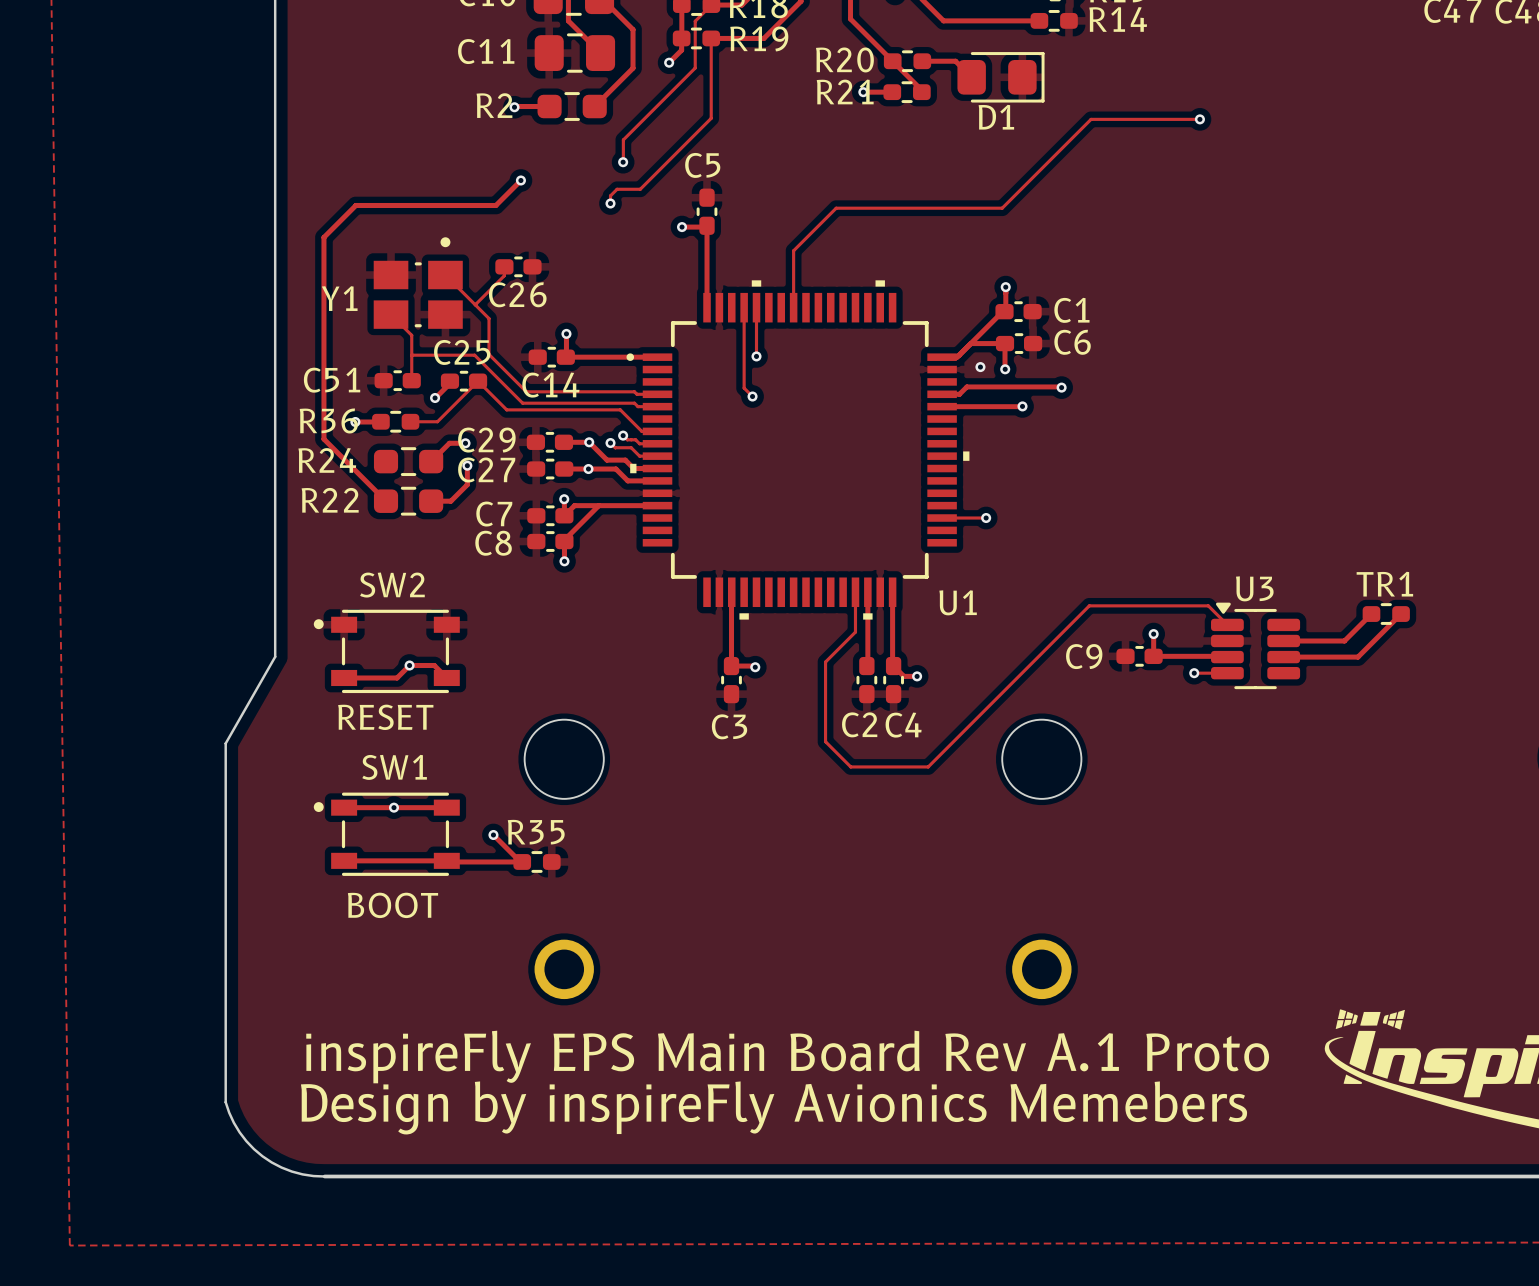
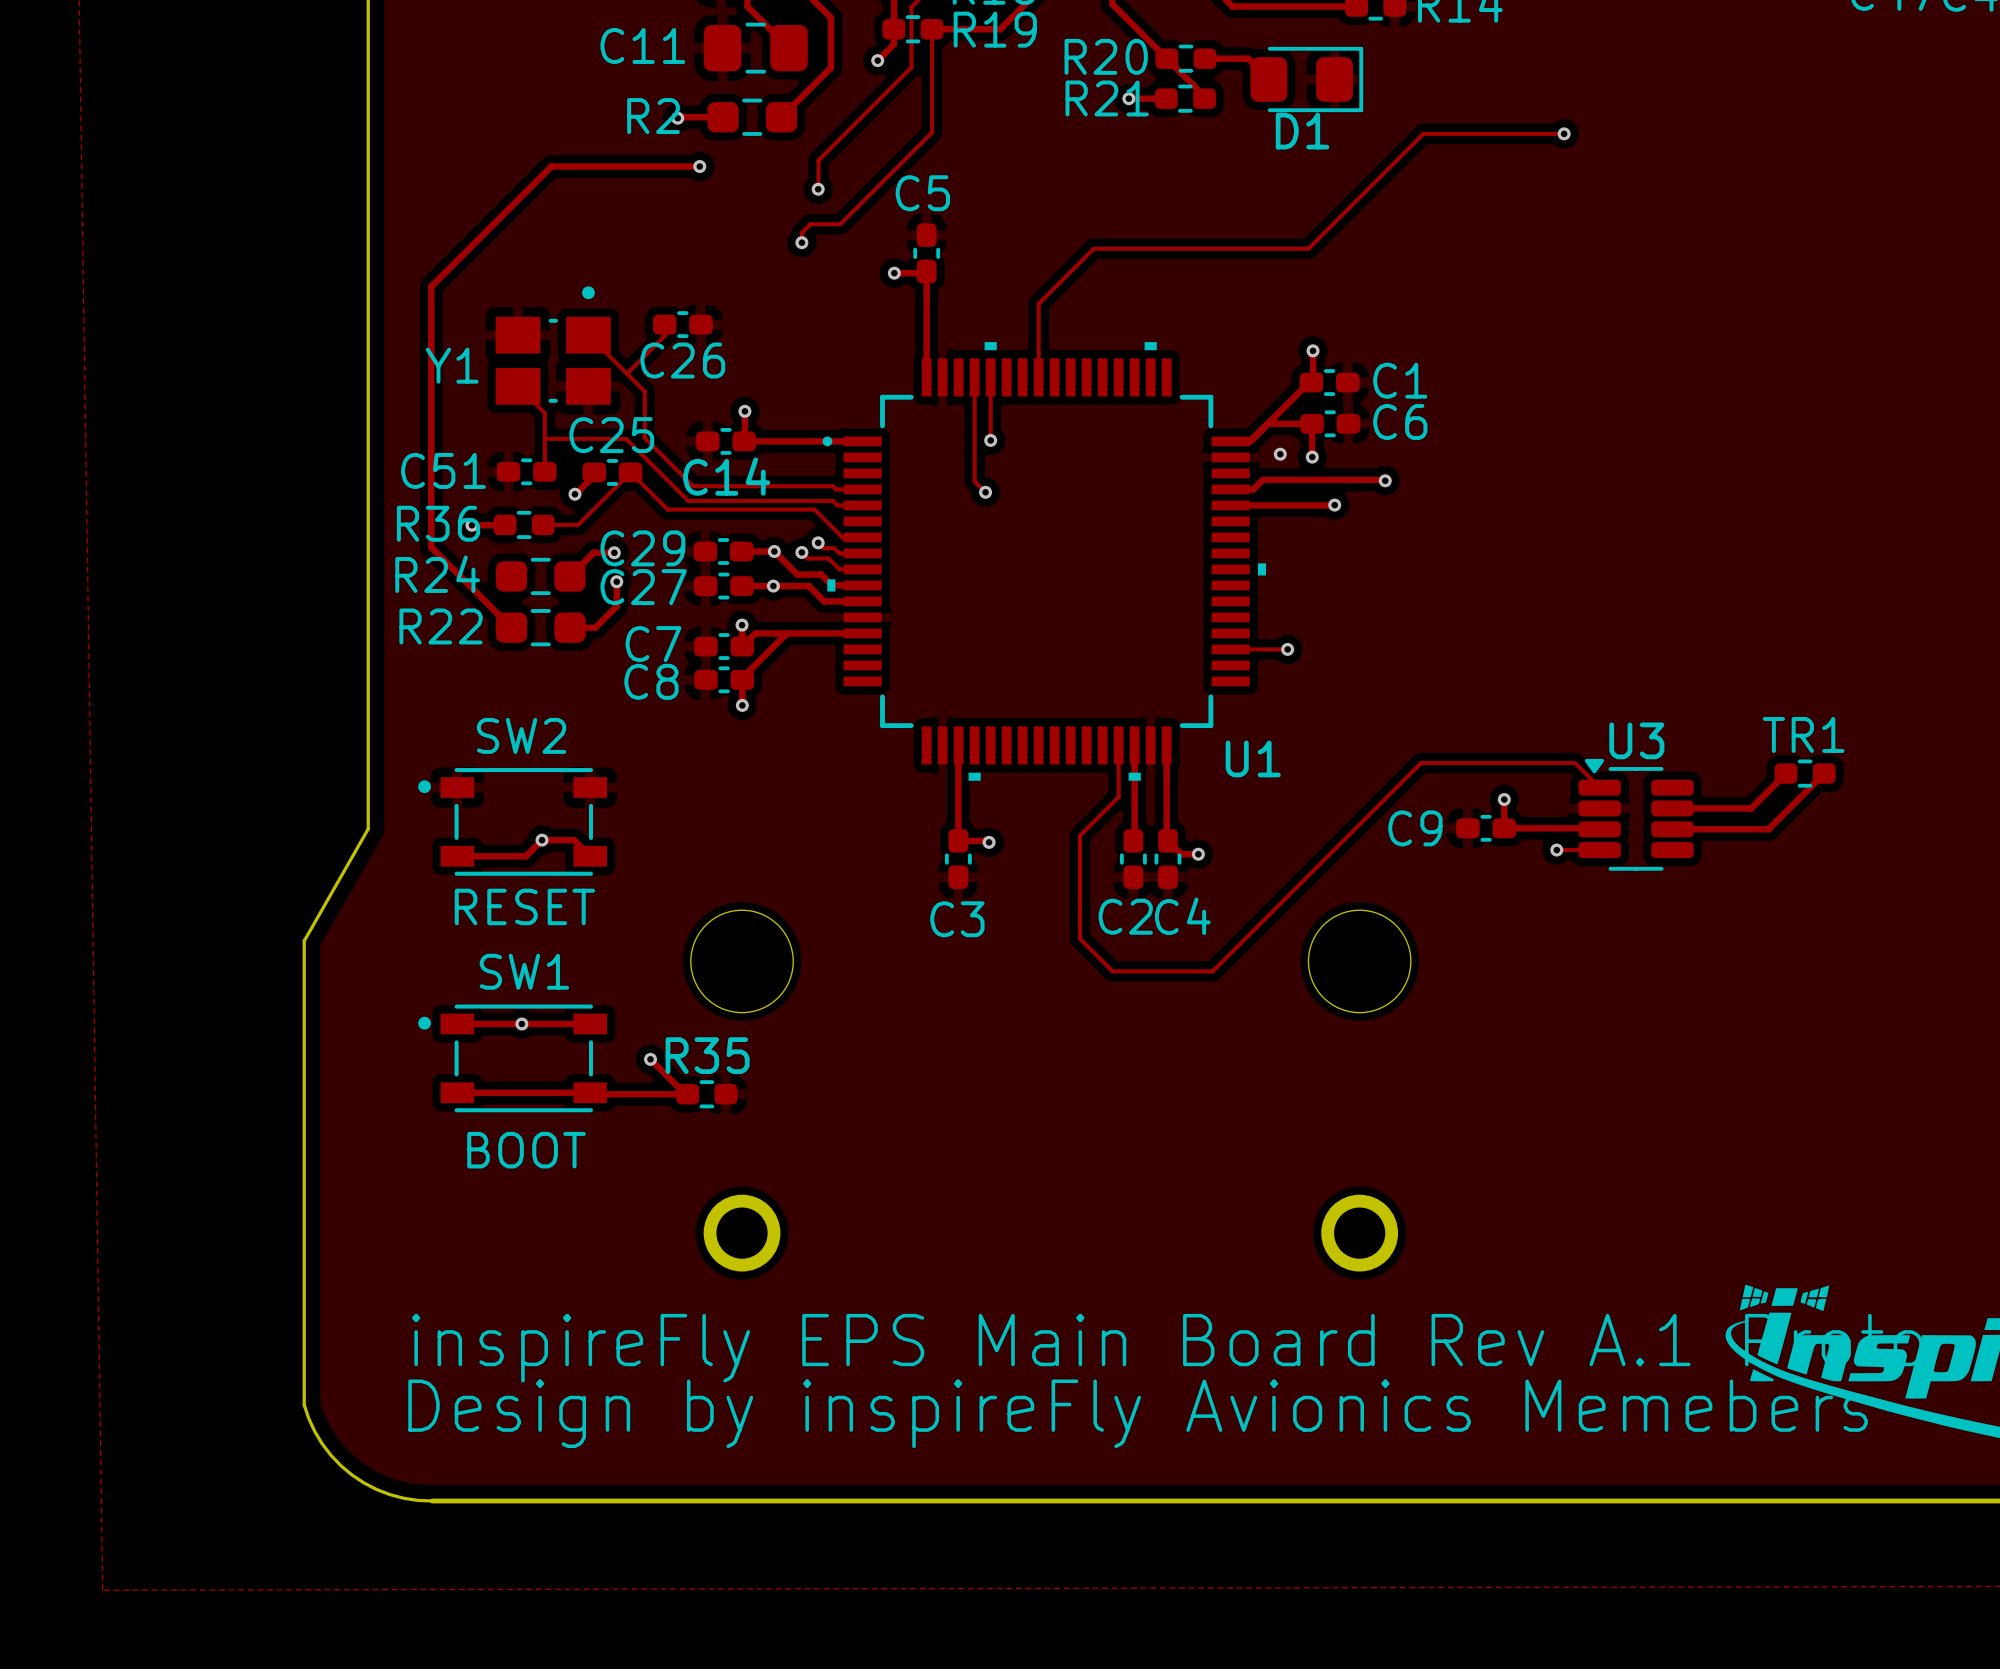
track: (520, 180) (495, 205) (355, 205) -> (699, 166) (551, 166) (472, 245)
via position: (520, 180) -> (699, 166)

